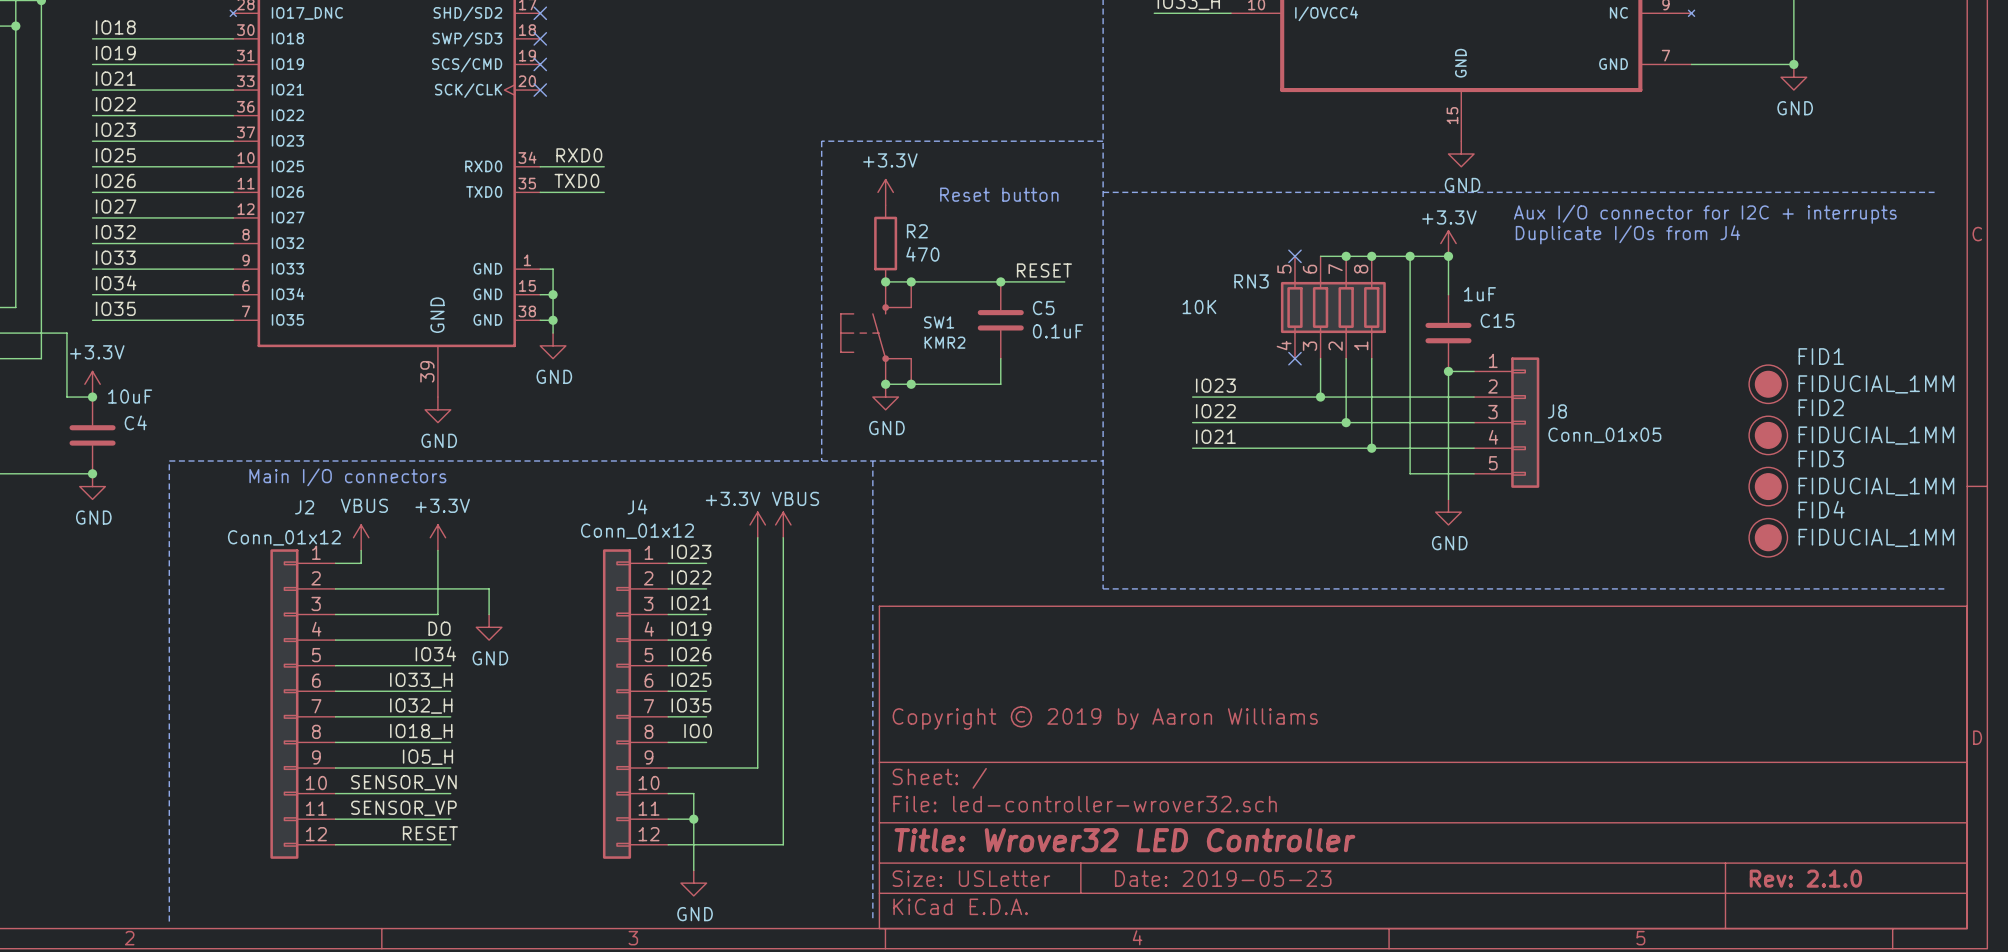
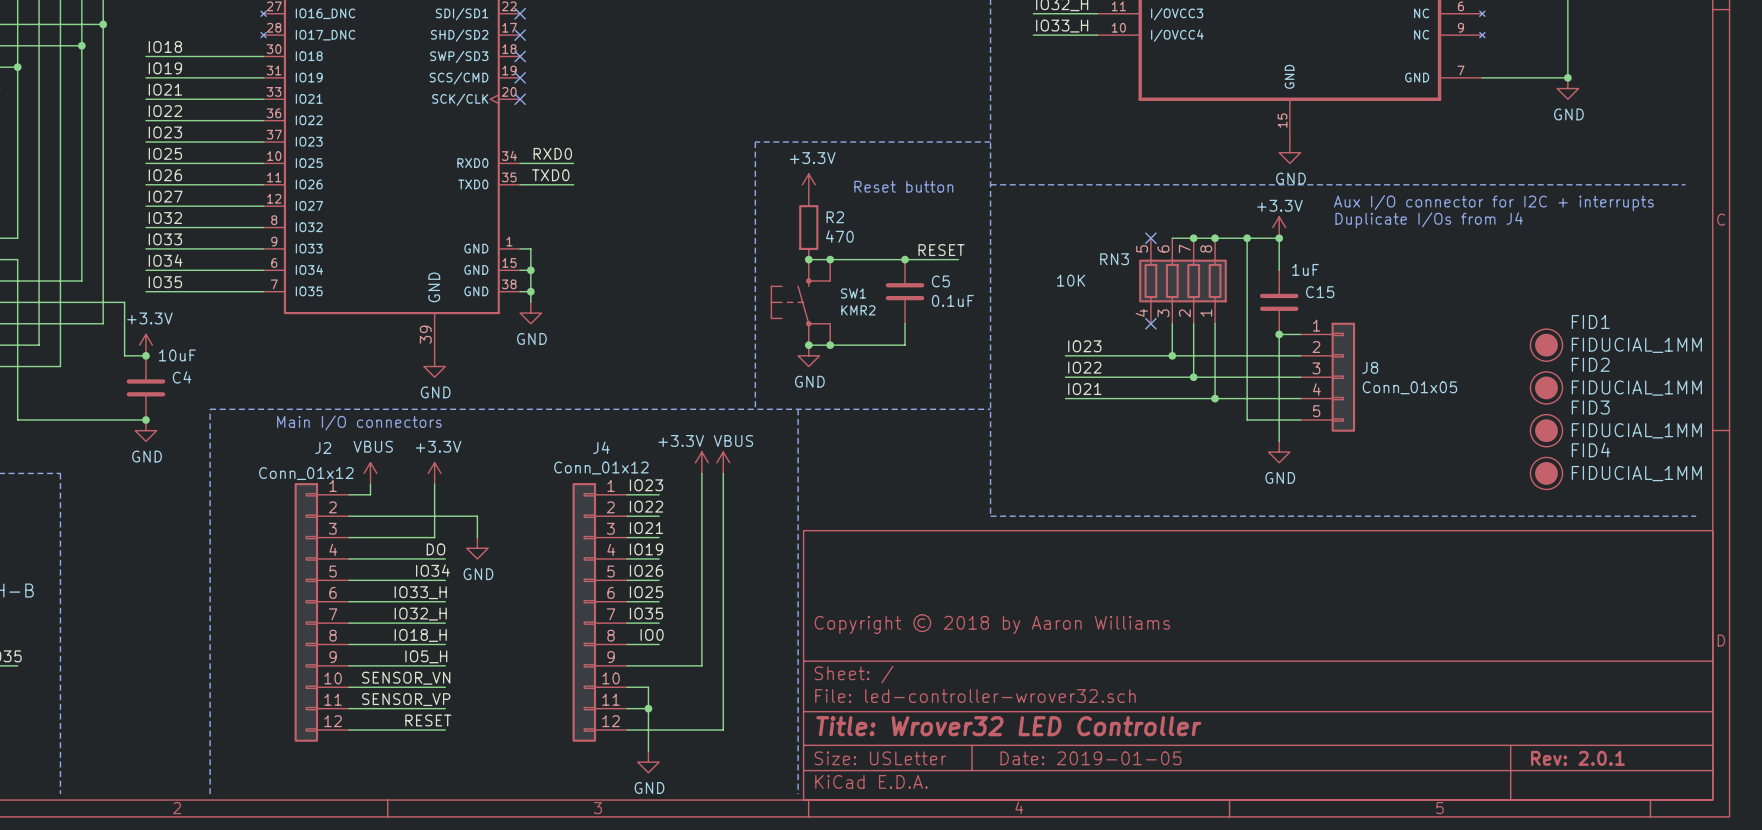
title block: Copyright © 2019 by Aaron Williams (1105, 717) -> Copyright © 2018 by Aaron Williams (992, 624)
title block: Date: 2019-05-23 (1223, 878) -> Date: 2019-01-05 (1090, 758)
title block: Rev: 2.1.0 (1805, 878) -> Rev: 2.0.1 (1577, 758)

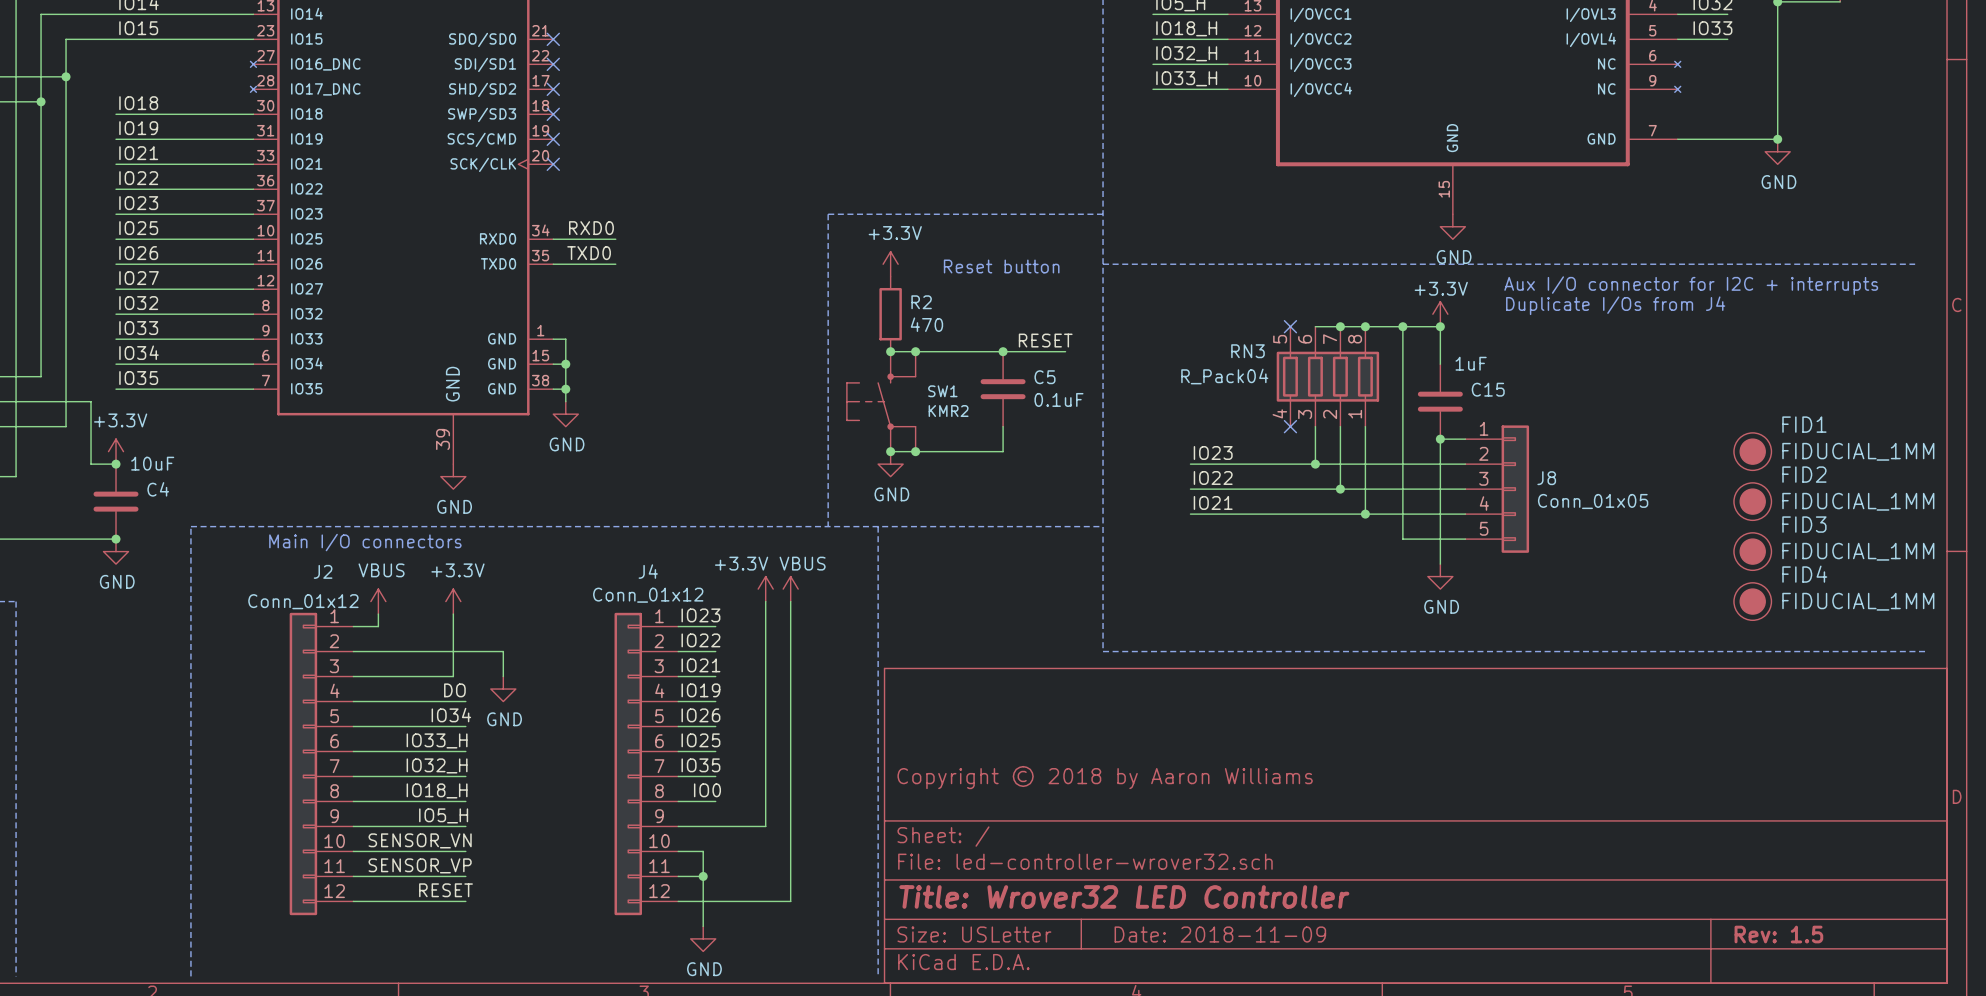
RN3 value: 10K (1071, 280) -> R_Pack04 (1224, 376)
title block: Date: 2019-01-05 (1090, 758) -> Date: 2018-11-09 (1220, 934)
title block: Rev: 2.0.1 (1577, 758) -> Rev: 1.5 (1778, 934)

